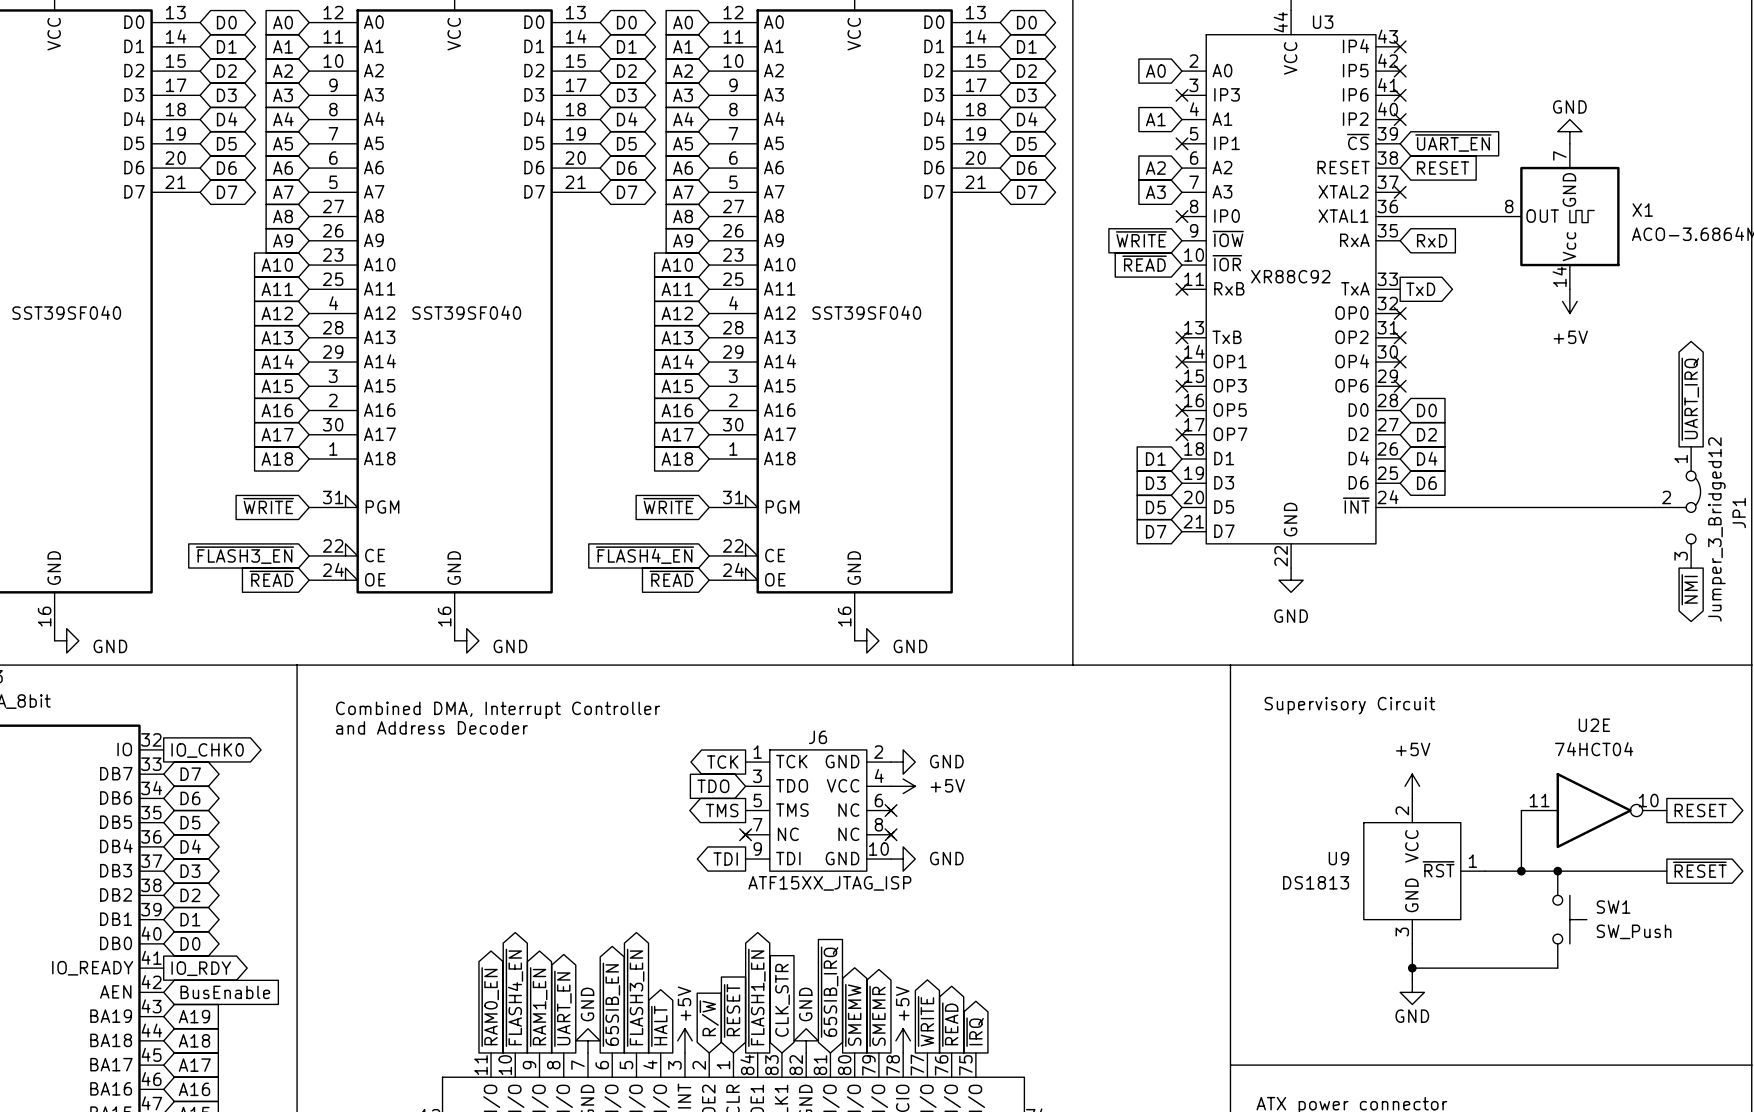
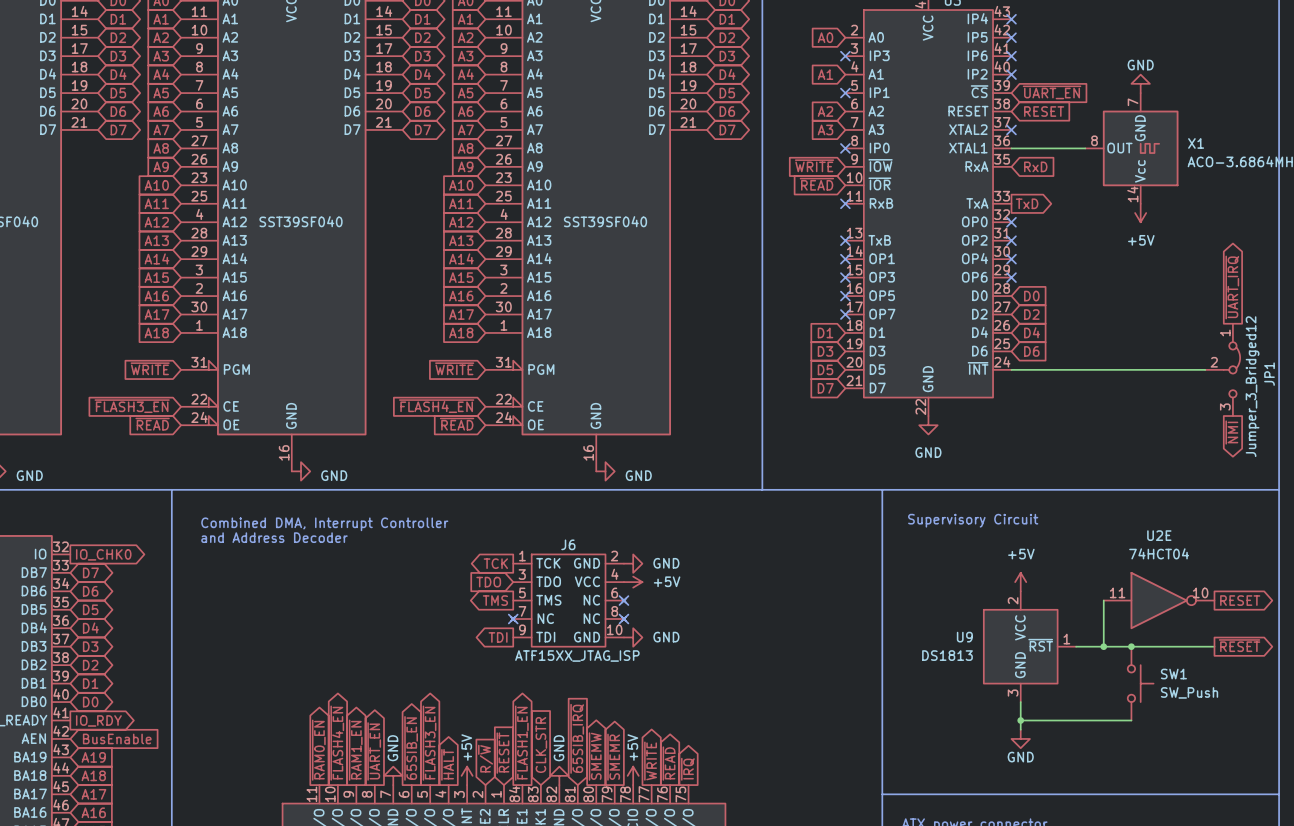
U3 value: XR88C92 (1290, 276) -> none

